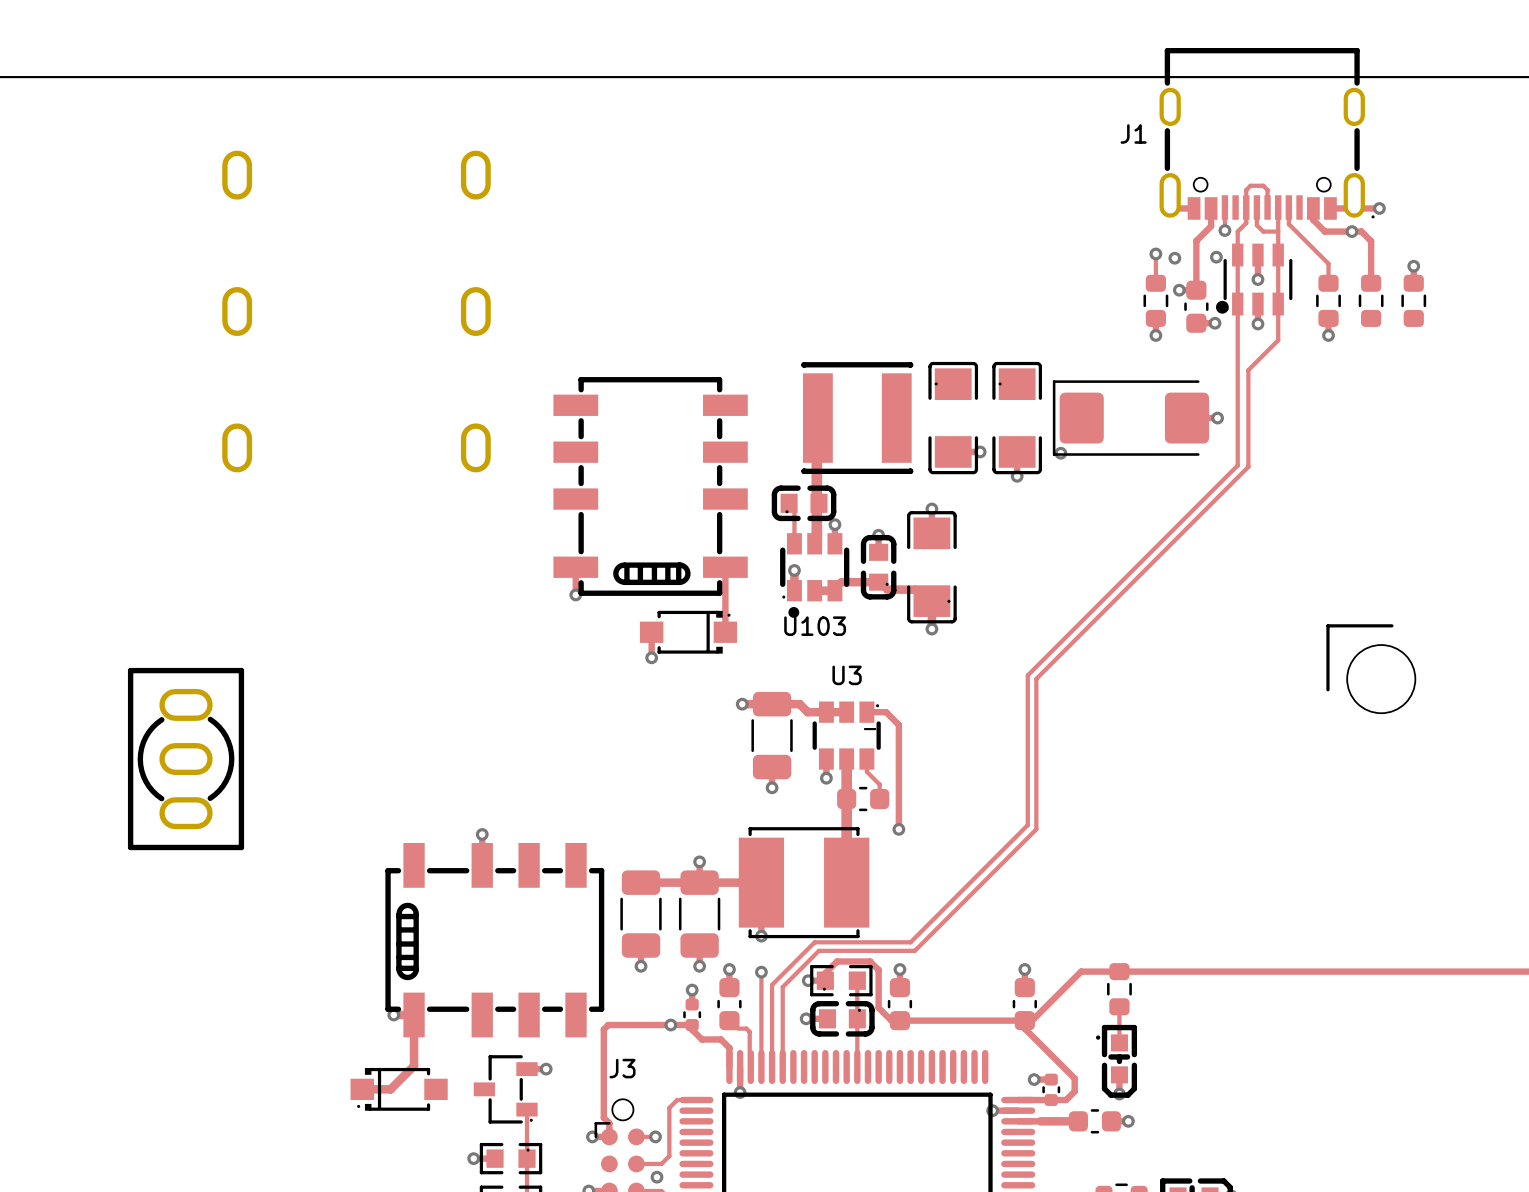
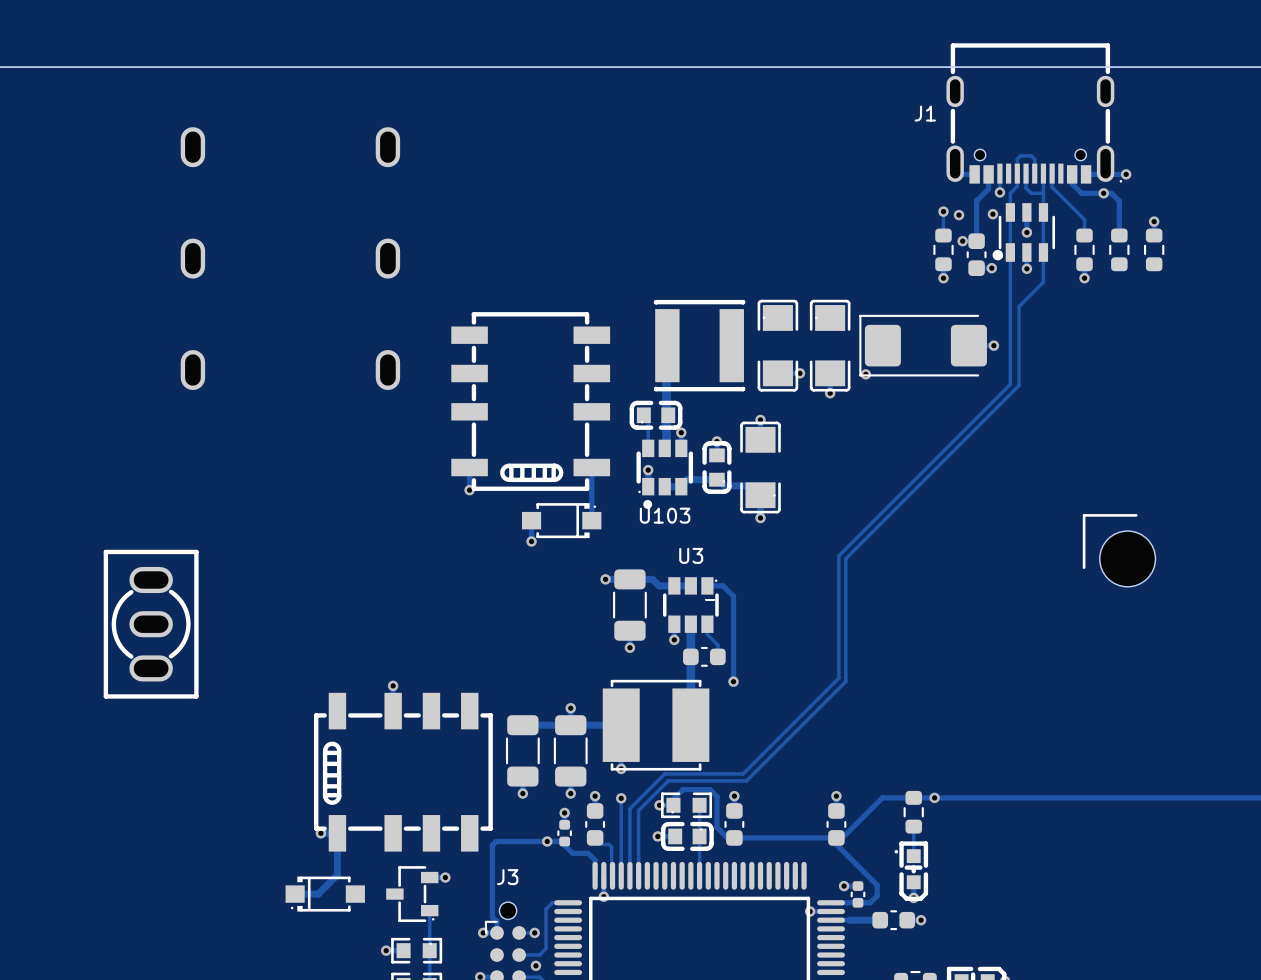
via: none -> (934, 797)

